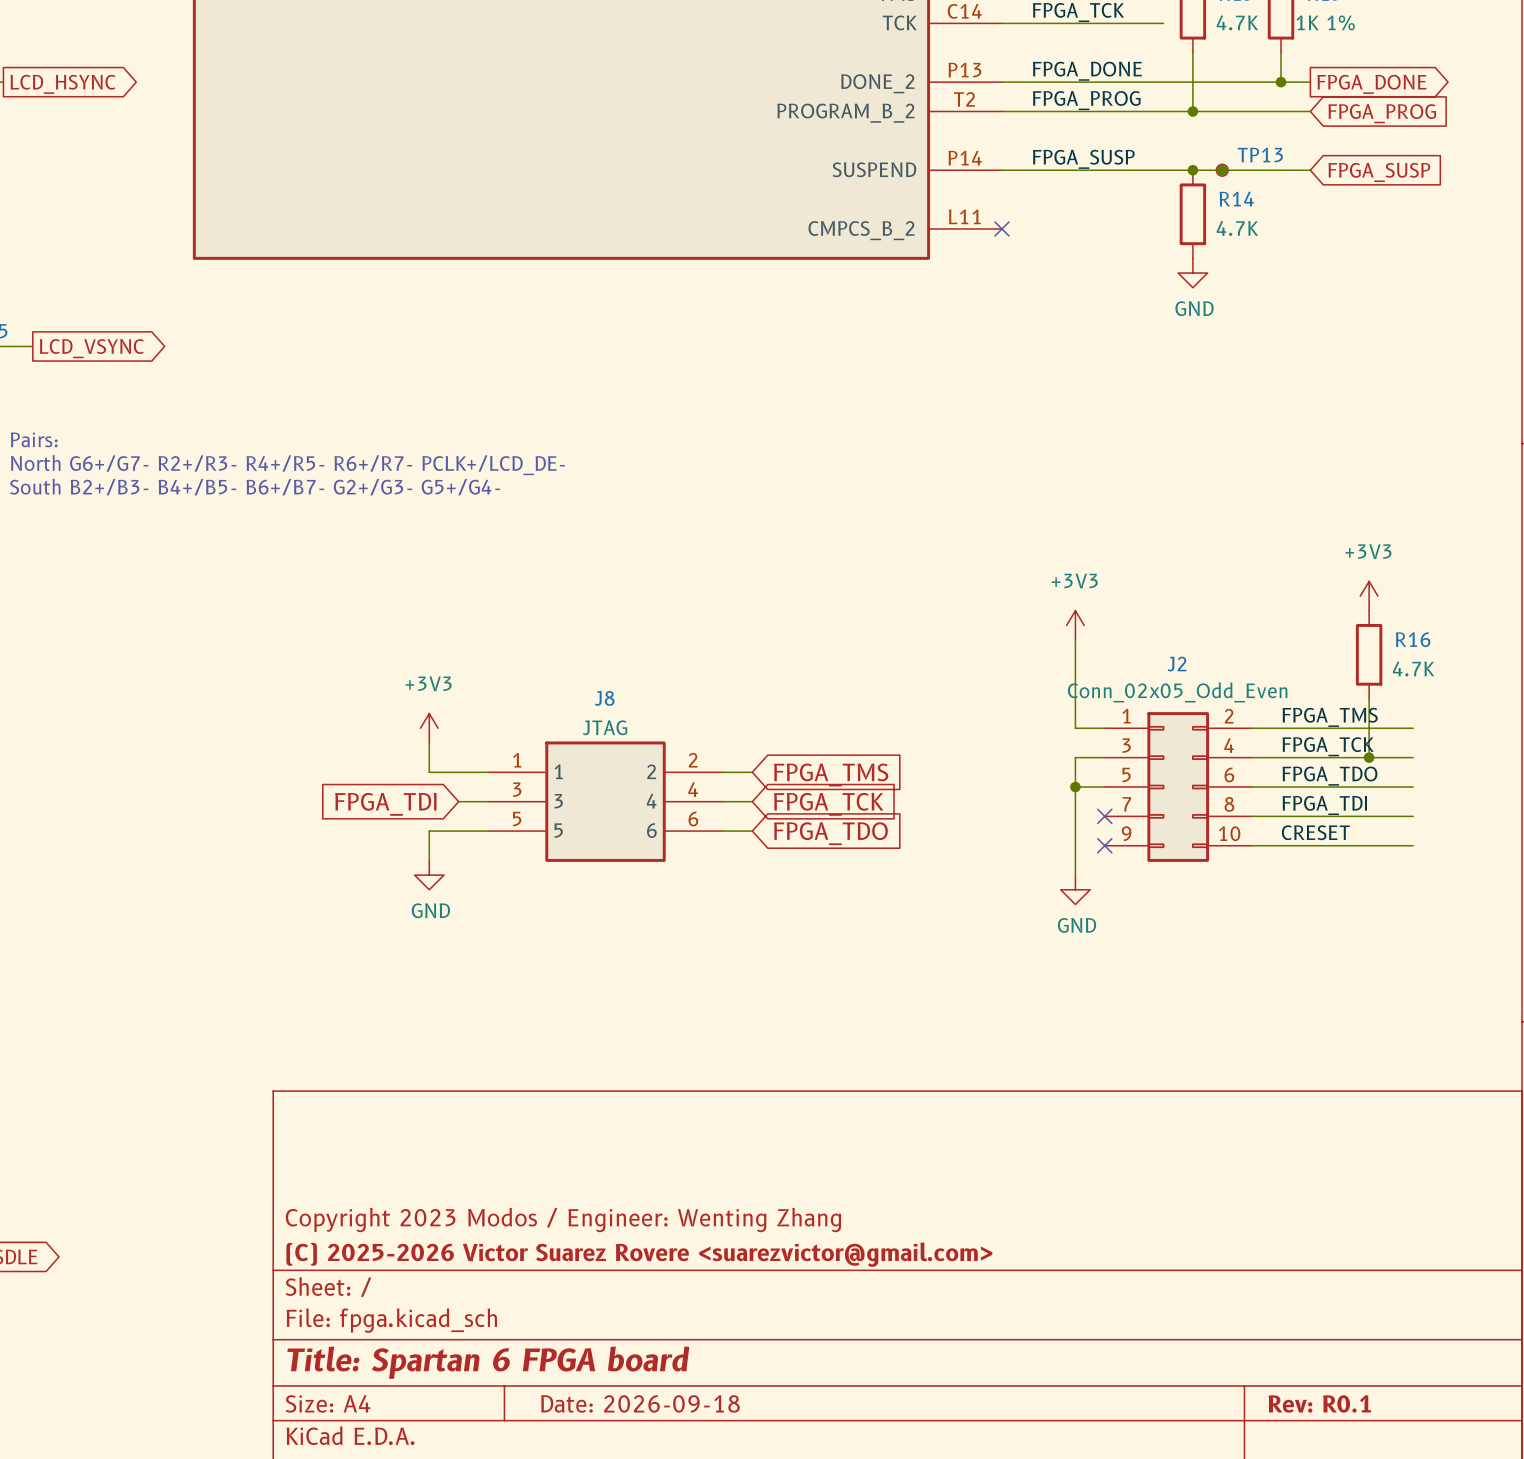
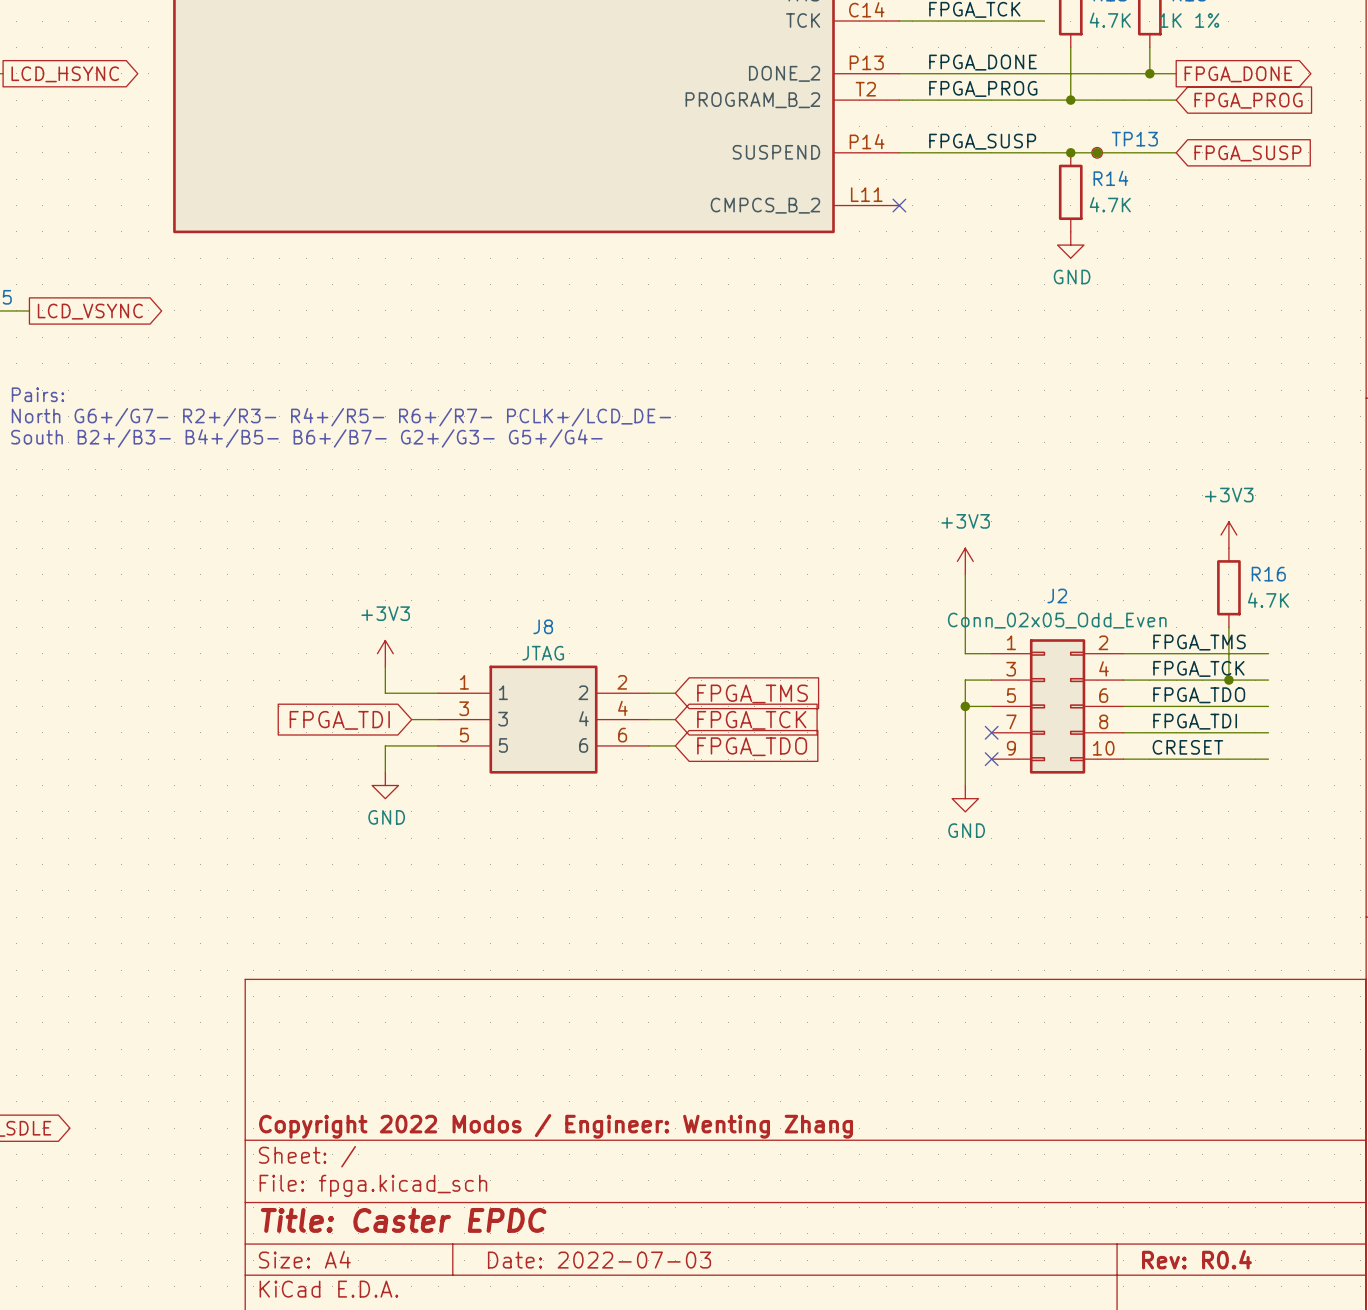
title block: Copyright 2023 Modos / Engineer: Wenting Zhang (563, 1220) -> none
title block: (C) 2025-2026 Victor Suarez Rovere <suarezvictor@gmail.com> (639, 1254) -> Copyright 2022 Modos / Engineer: Wenting Zhang (556, 1126)
title block: Title: Spartan 6 FPGA board (488, 1362) -> Title: Caster EPDC (403, 1220)
title block: Date: 2026-09-18 (640, 1403) -> Date: 2022-07-03 (599, 1260)
title block: Rev: R0.1 (1319, 1403) -> Rev: R0.4 (1196, 1259)

